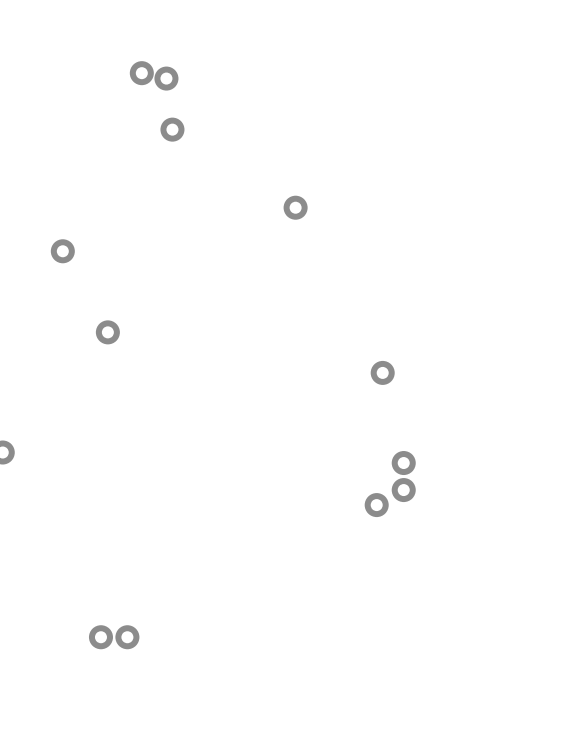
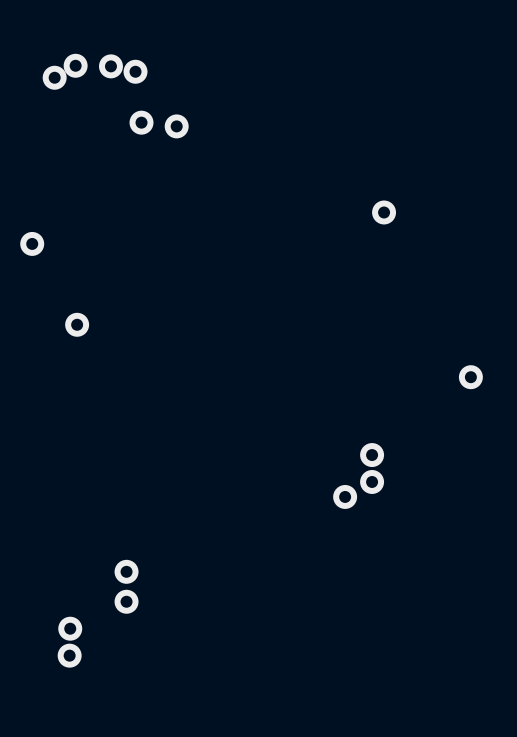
via: none -> (75, 65)
via: none -> (54, 77)
via: none -> (176, 126)
via: (295, 207) -> none
via: none -> (384, 212)
via: (382, 372) -> none
via: none -> (470, 377)
via: none -> (126, 571)
via: none -> (126, 601)
via: (127, 637) -> none
via: none -> (69, 655)

